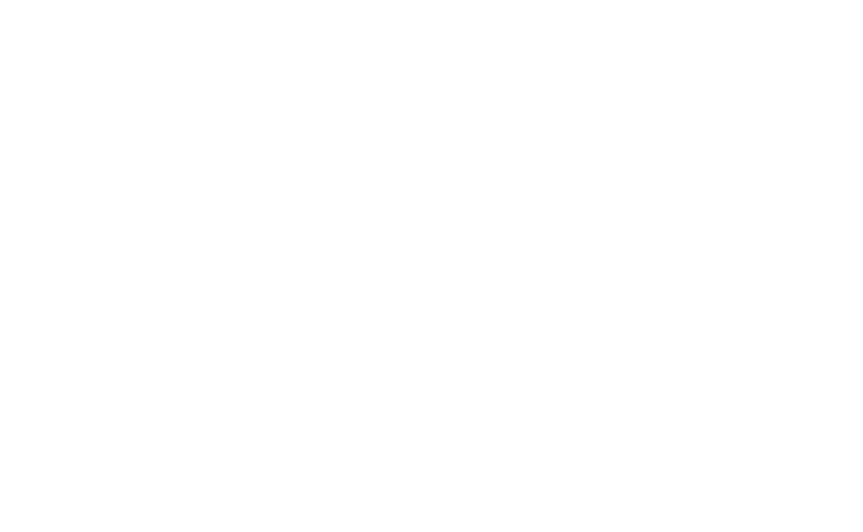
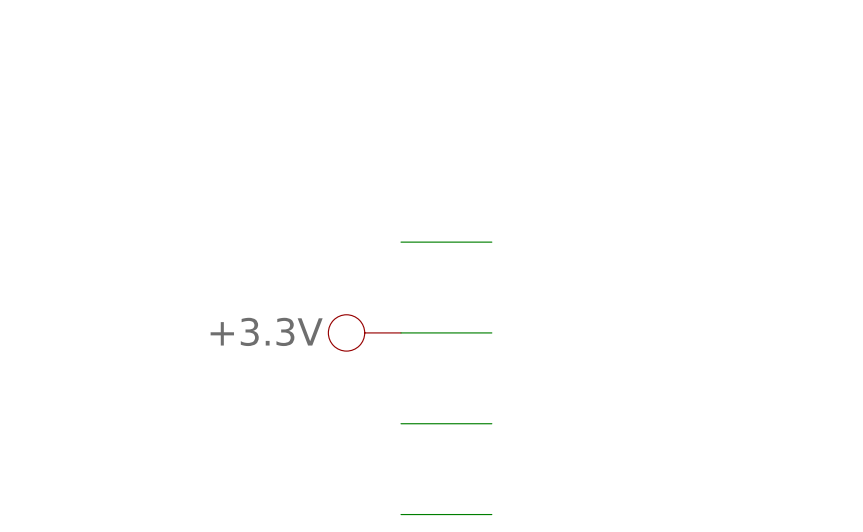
wire: none -> (401, 242) (491, 242)
power symbol: none -> +3.3V (364, 332)
wire: none -> (401, 332) (491, 332)
wire: none -> (401, 423) (491, 423)
wire: none -> (401, 514) (491, 514)

